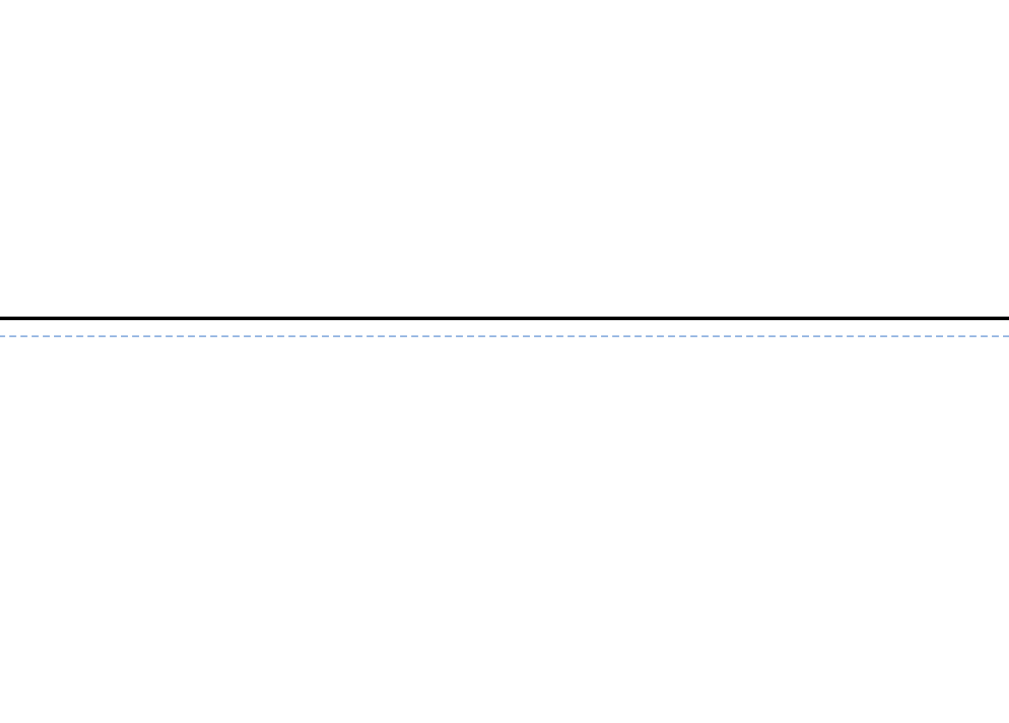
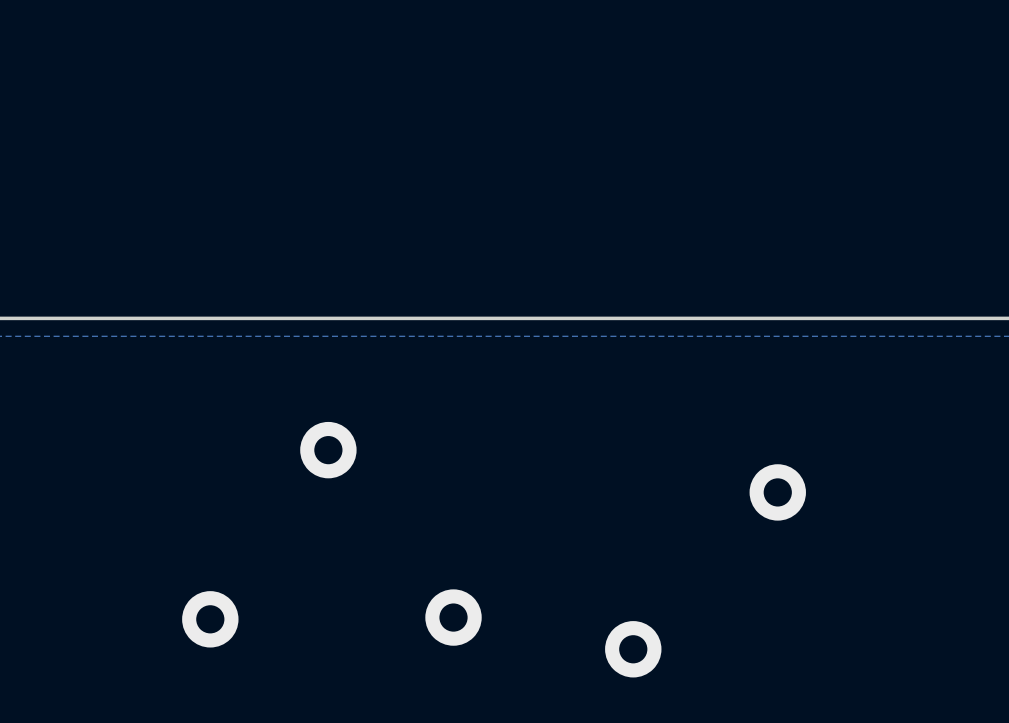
via: none -> (328, 450)
via: none -> (777, 492)
via: none -> (453, 617)
via: none -> (210, 619)
via: none -> (633, 649)

